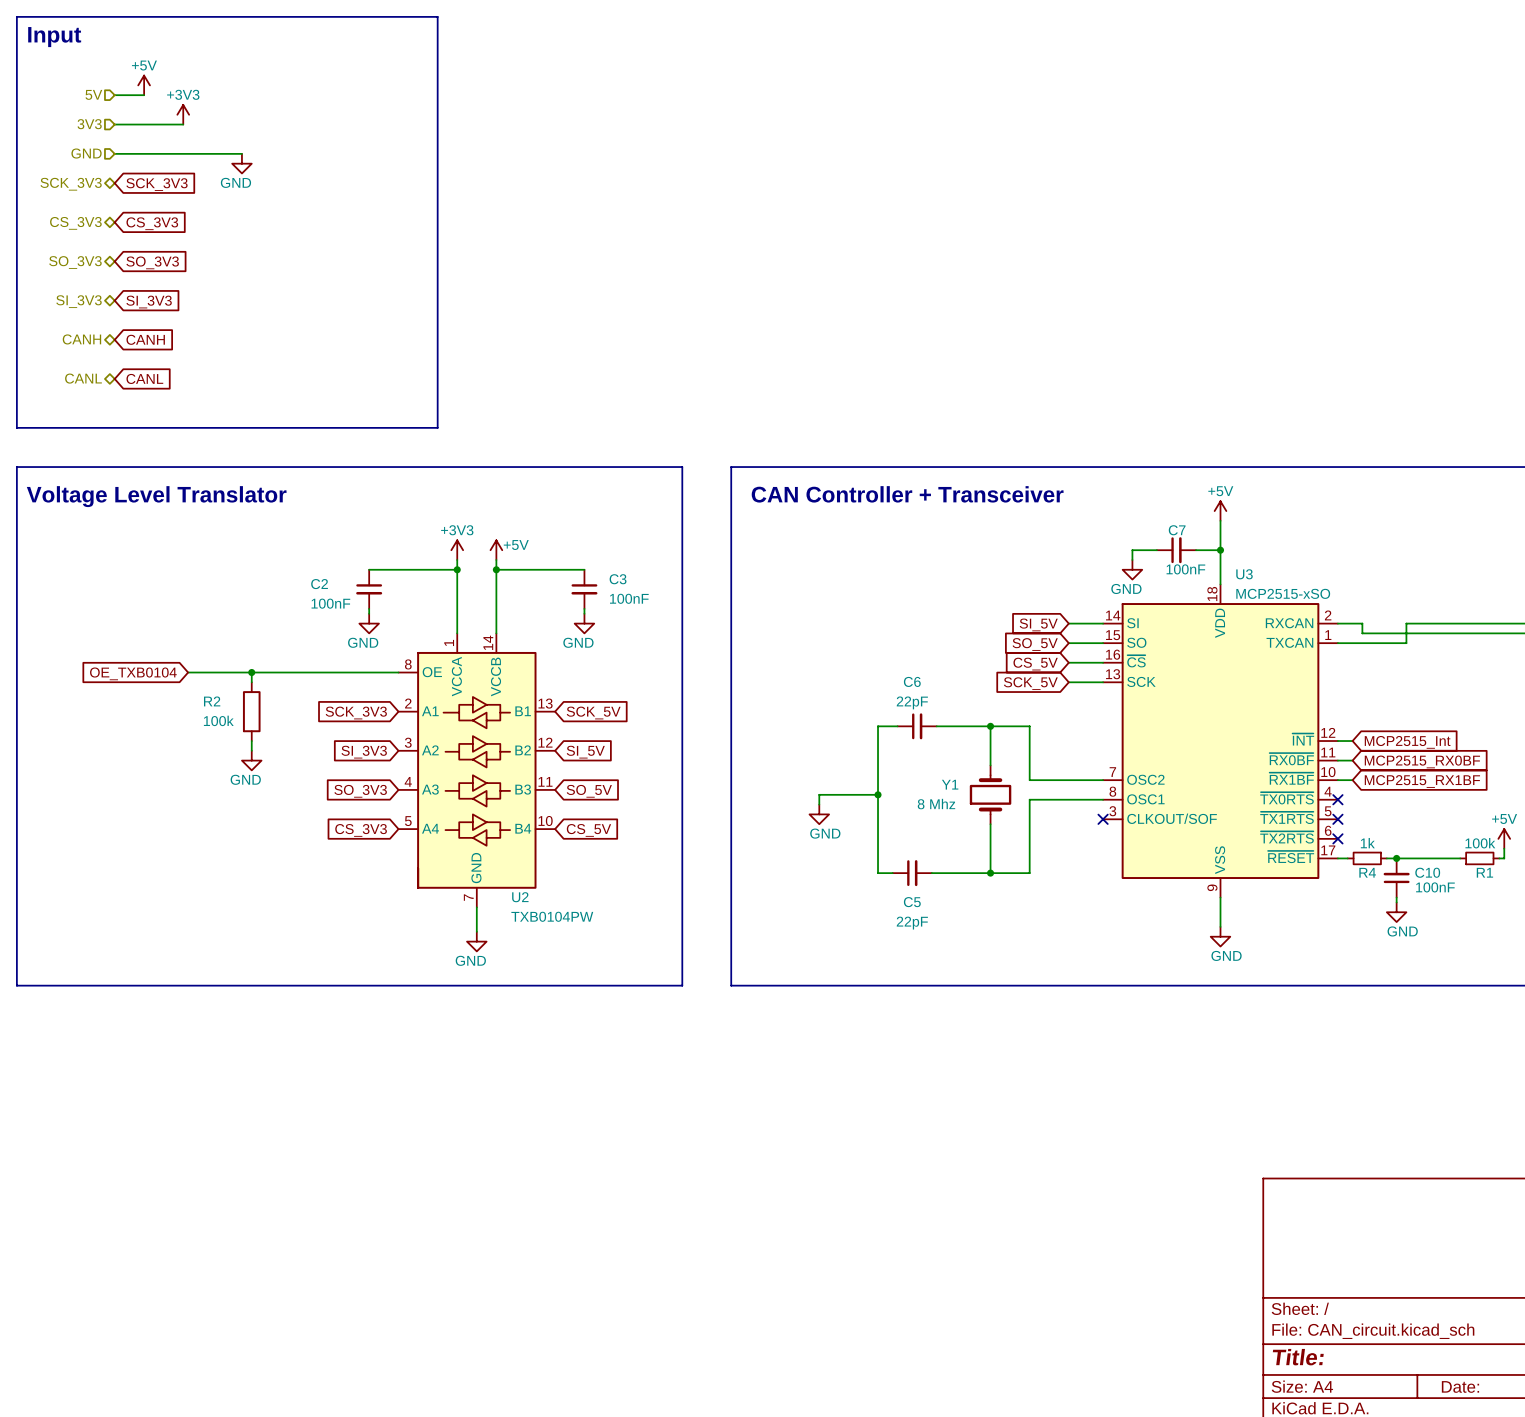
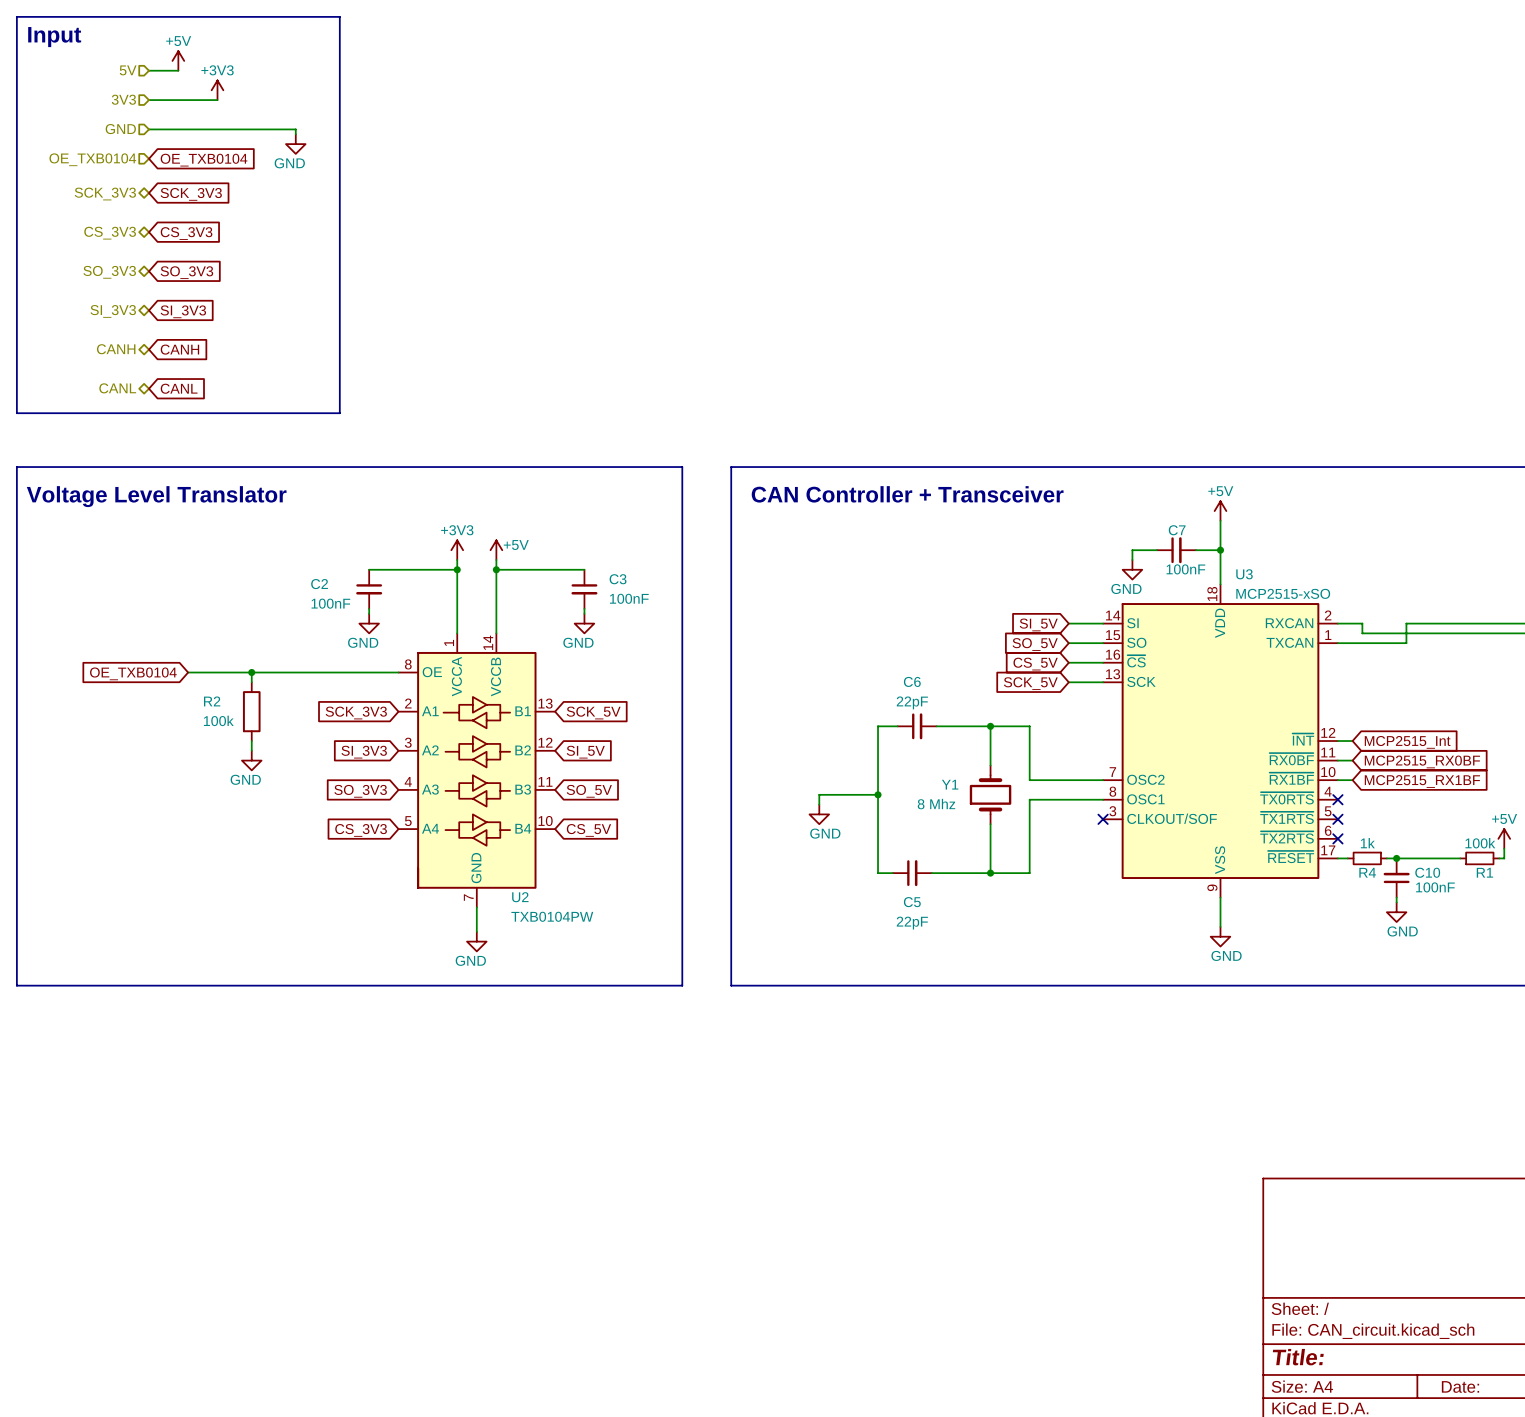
line: (339, 16) (437, 16) (437, 427) (16, 427) (16, 413) -> (339, 16) (339, 413) (16, 413)
power symbol position: +5V (144, 85) -> +5V (178, 60)
hierarchical label position: 5V (93, 94) -> 5V (128, 70)
wire: (114, 95) (144, 95) -> (149, 70) (178, 70)
power symbol position: +3V3 (183, 114) -> +3V3 (217, 90)
hierarchical label position: 3V3 (89, 124) -> 3V3 (123, 99)
wire: (114, 124) (183, 124) -> (149, 100) (217, 100)
wire: none -> (149, 129) (295, 129) (295, 134)
hierarchical label position: GND (86, 153) -> GND (120, 129)
wire: (114, 153) (241, 153) -> none
hierarchical label: none -> OE_TXB0104 (92, 159)
global label: none -> OE_TXB0104 (204, 160)
power symbol position: GND (241, 163) -> GND (295, 144)
hierarchical label position: SCK_3V3 (71, 184) -> SCK_3V3 (105, 194)
global label position: SCK_3V3 (157, 184) -> SCK_3V3 (191, 194)
hierarchical label position: CS_3V3 (75, 223) -> CS_3V3 (110, 233)
global label position: CS_3V3 (152, 223) -> CS_3V3 (186, 233)
hierarchical label position: SO_3V3 (75, 262) -> SO_3V3 (109, 272)
global label position: SO_3V3 (152, 262) -> SO_3V3 (186, 272)
hierarchical label position: SI_3V3 (79, 301) -> SI_3V3 (113, 311)
global label position: SI_3V3 (149, 302) -> SI_3V3 (183, 311)
hierarchical label position: CANH (81, 339) -> CANH (116, 349)
global label position: CANH (145, 339) -> CANH (179, 349)
hierarchical label position: CANL (83, 378) -> CANL (117, 388)
global label position: CANL (144, 378) -> CANL (179, 388)

